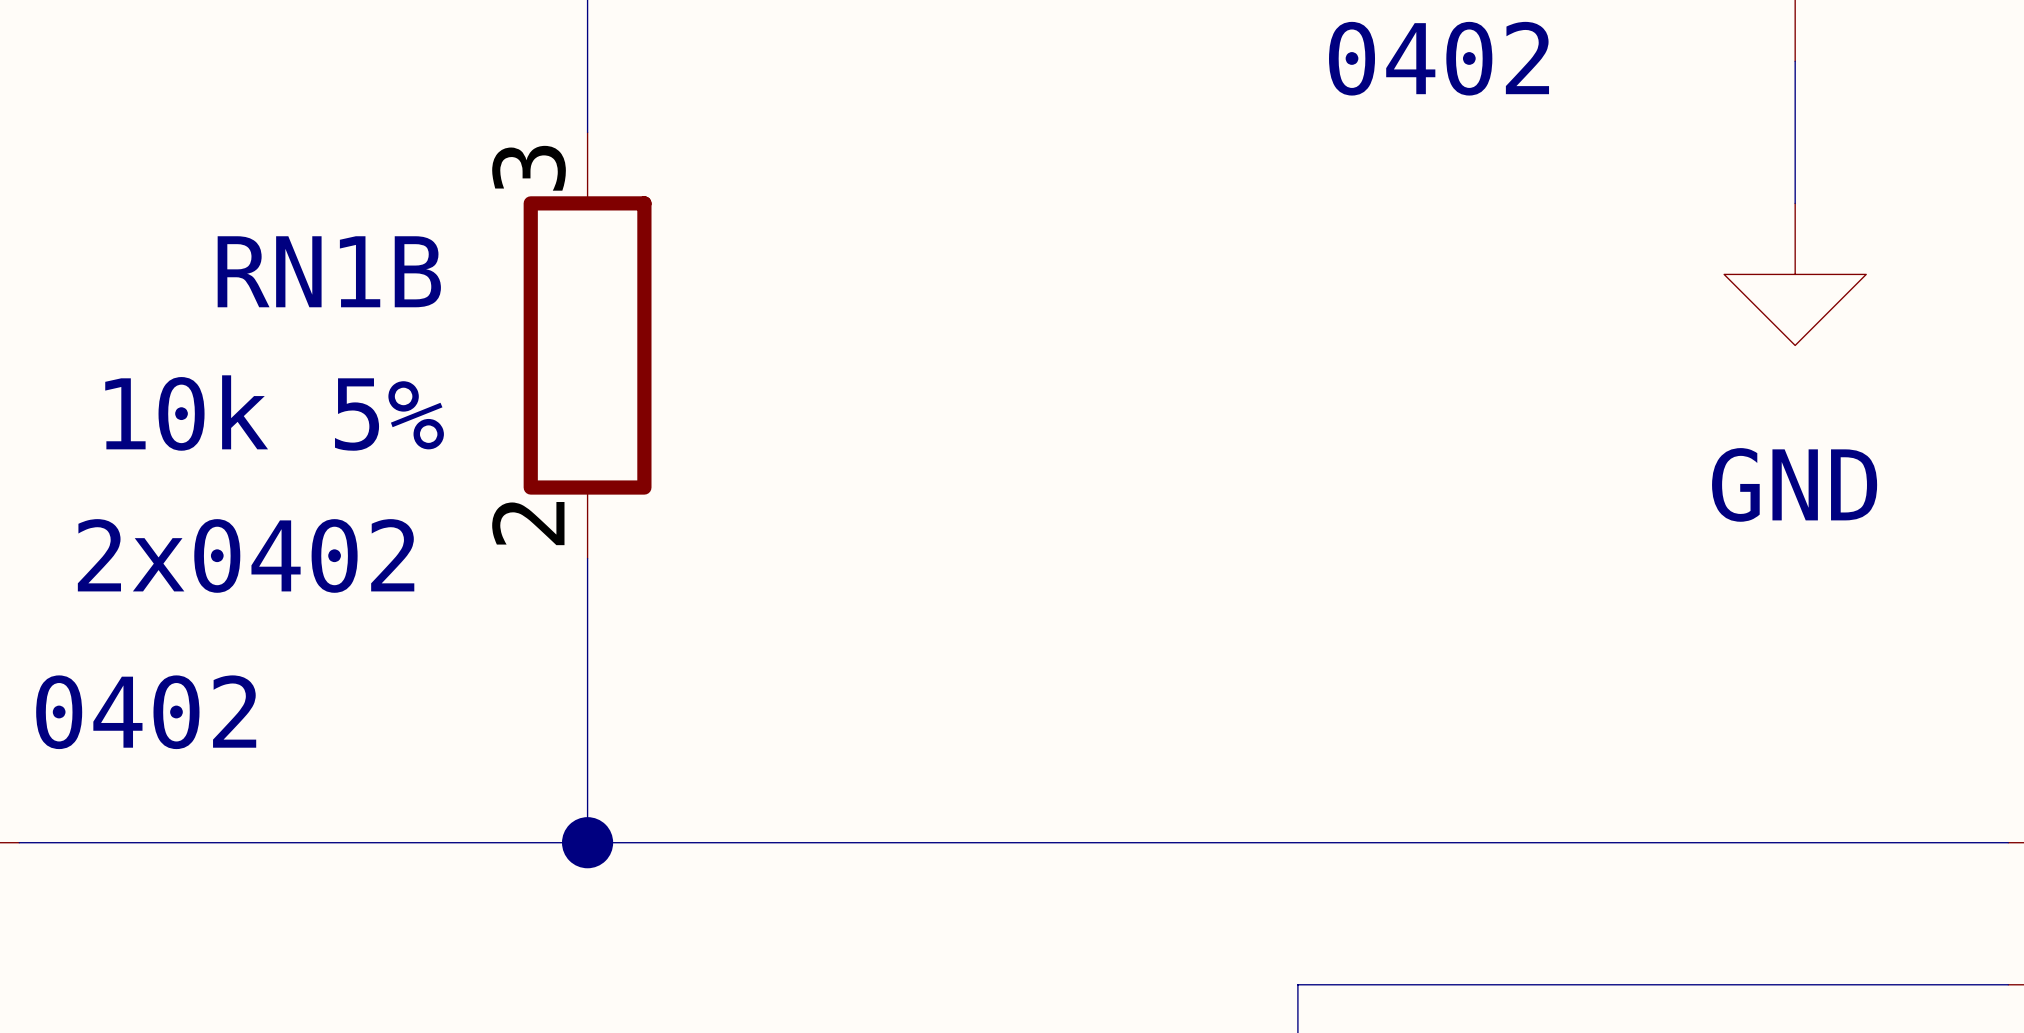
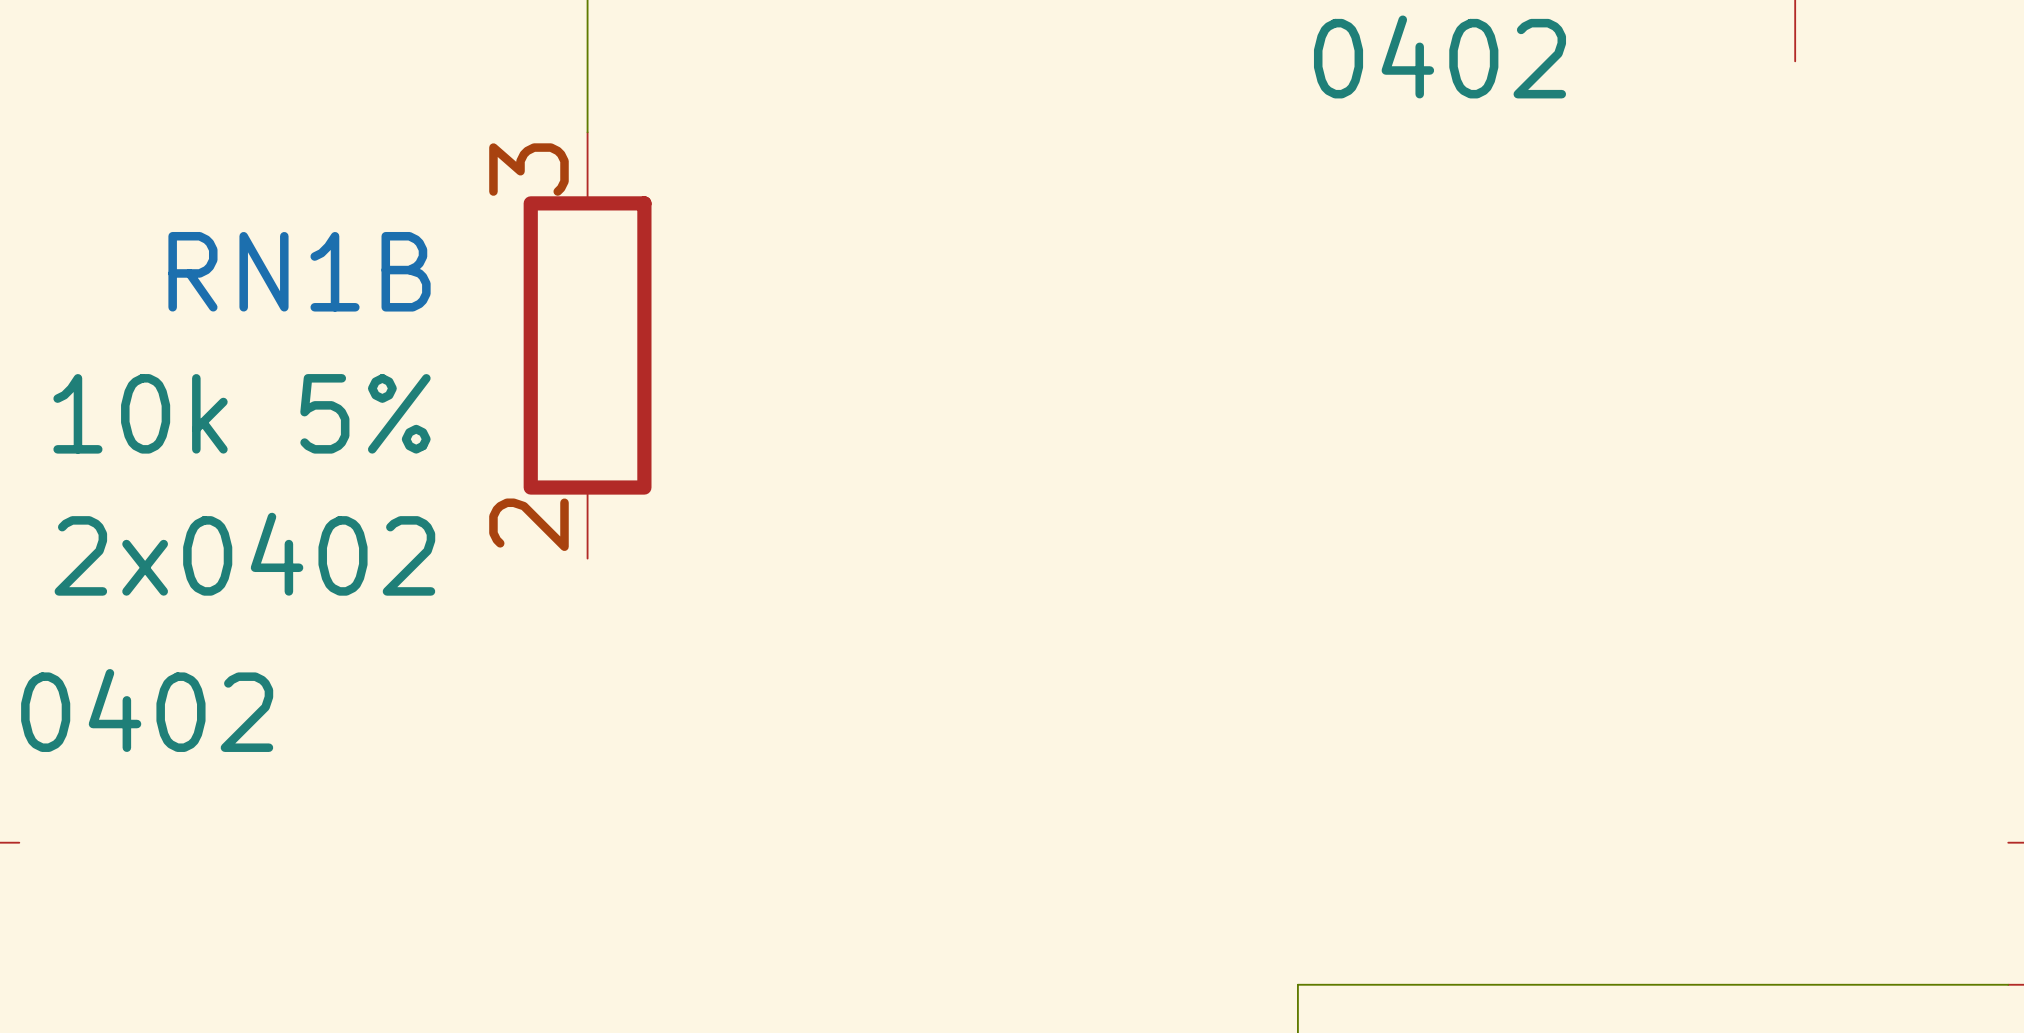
wire: (1795, 61) (1795, 203) -> none
power symbol: GND (1795, 274) -> none
wire: (587, 558) (587, 842) -> none
wire: (19, 842) (2008, 842) -> none
junction: (587, 842) -> none

